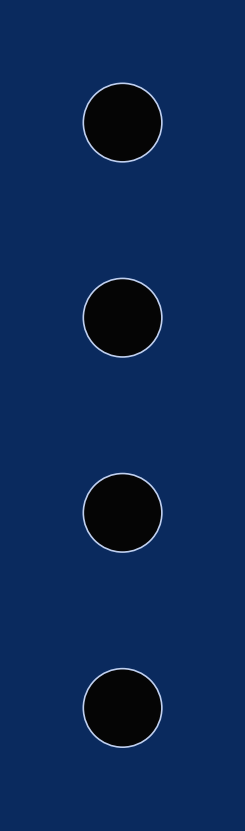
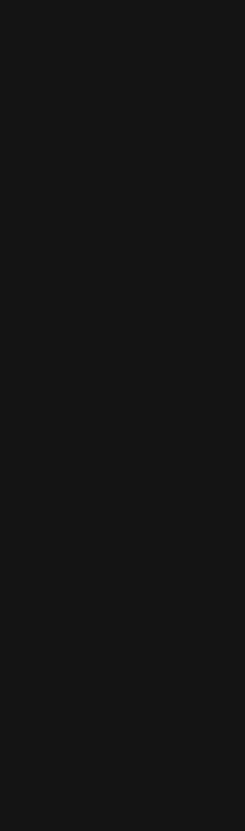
part: (122, 122) -> none
part: (122, 317) -> none
part: (122, 512) -> none
part: (122, 707) -> none

